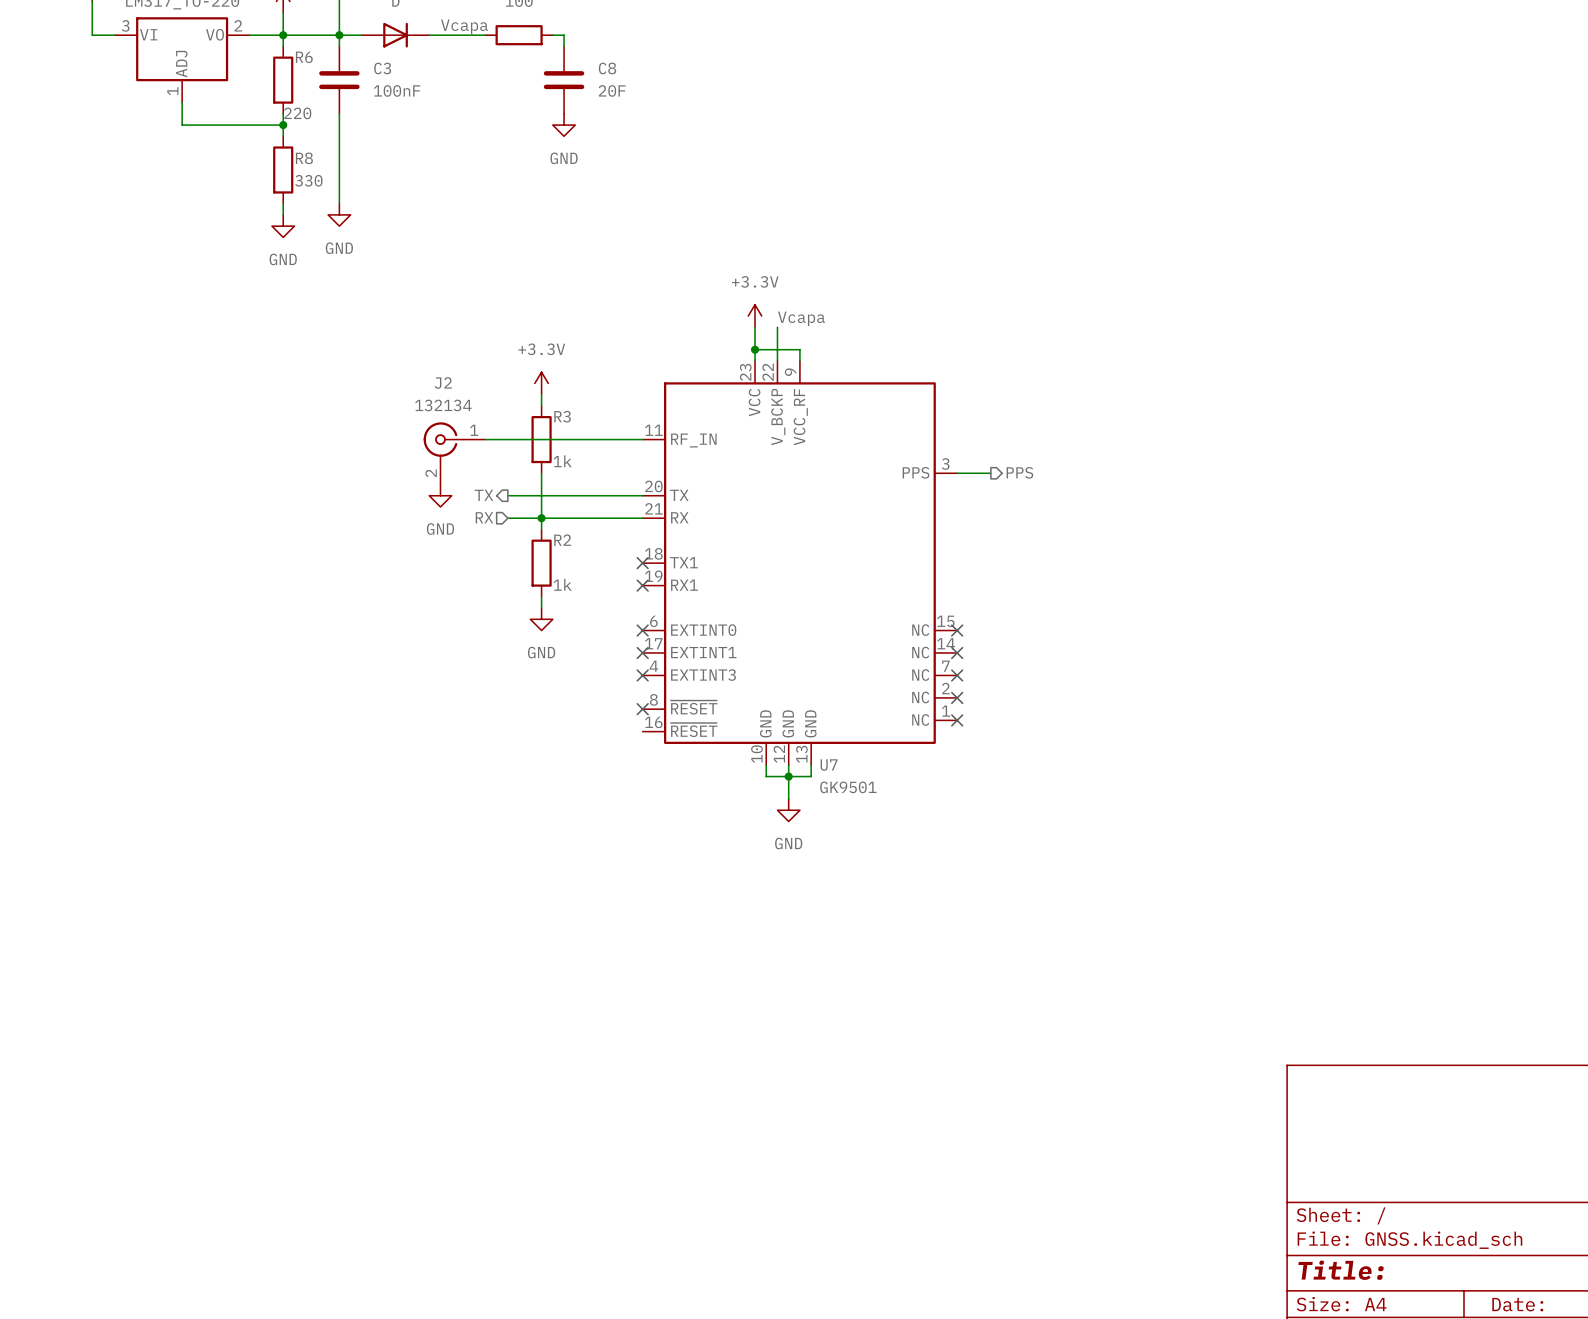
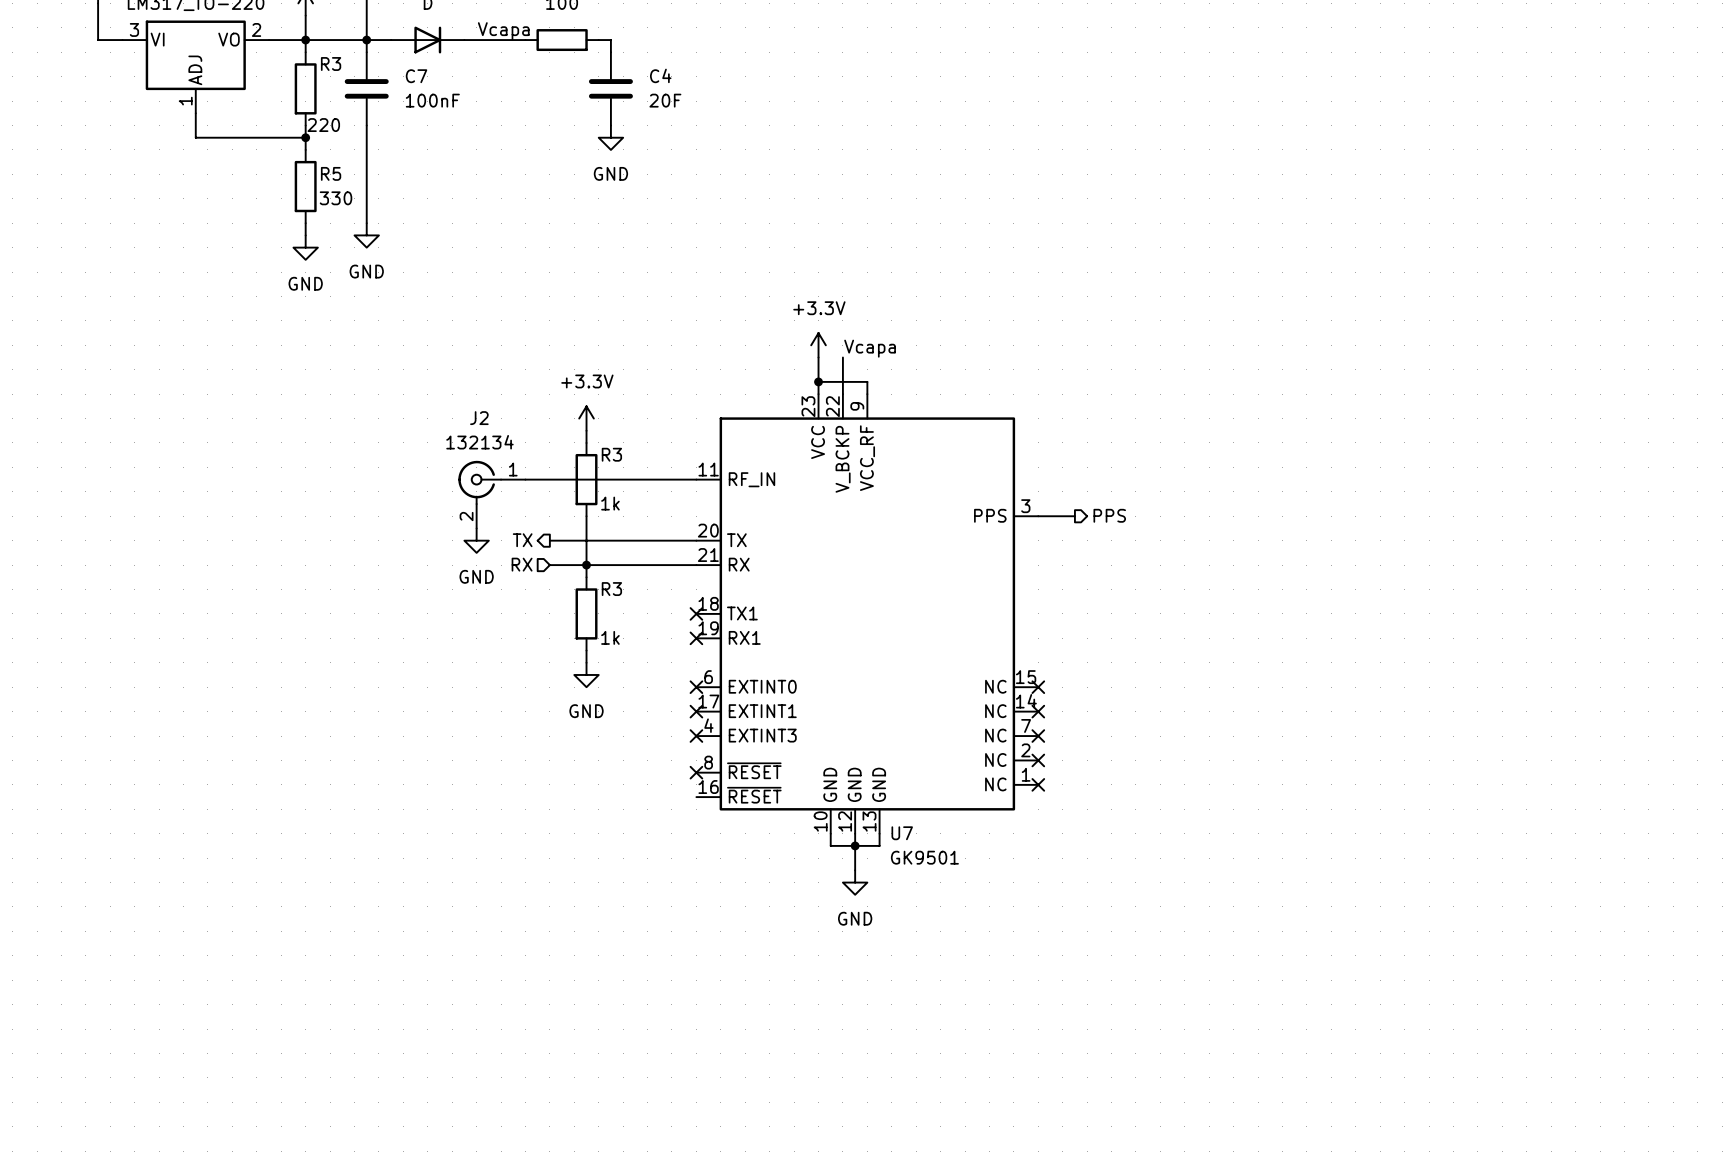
R6 name: R6 (304, 57) -> R3 (331, 64)
C3 name: C3 (382, 68) -> C7 (416, 76)
C8 name: C8 (607, 68) -> C4 (660, 75)
R8 name: R8 (304, 158) -> R5 (331, 173)
R2 name: R2 (562, 540) -> R3 (611, 589)

